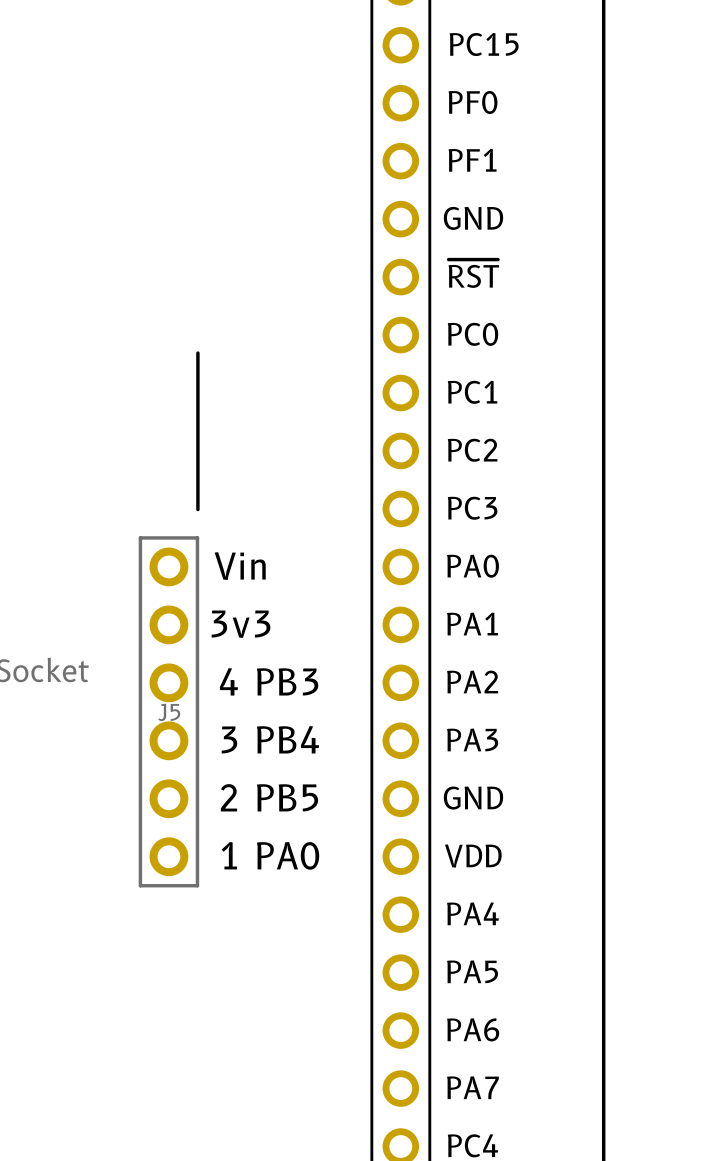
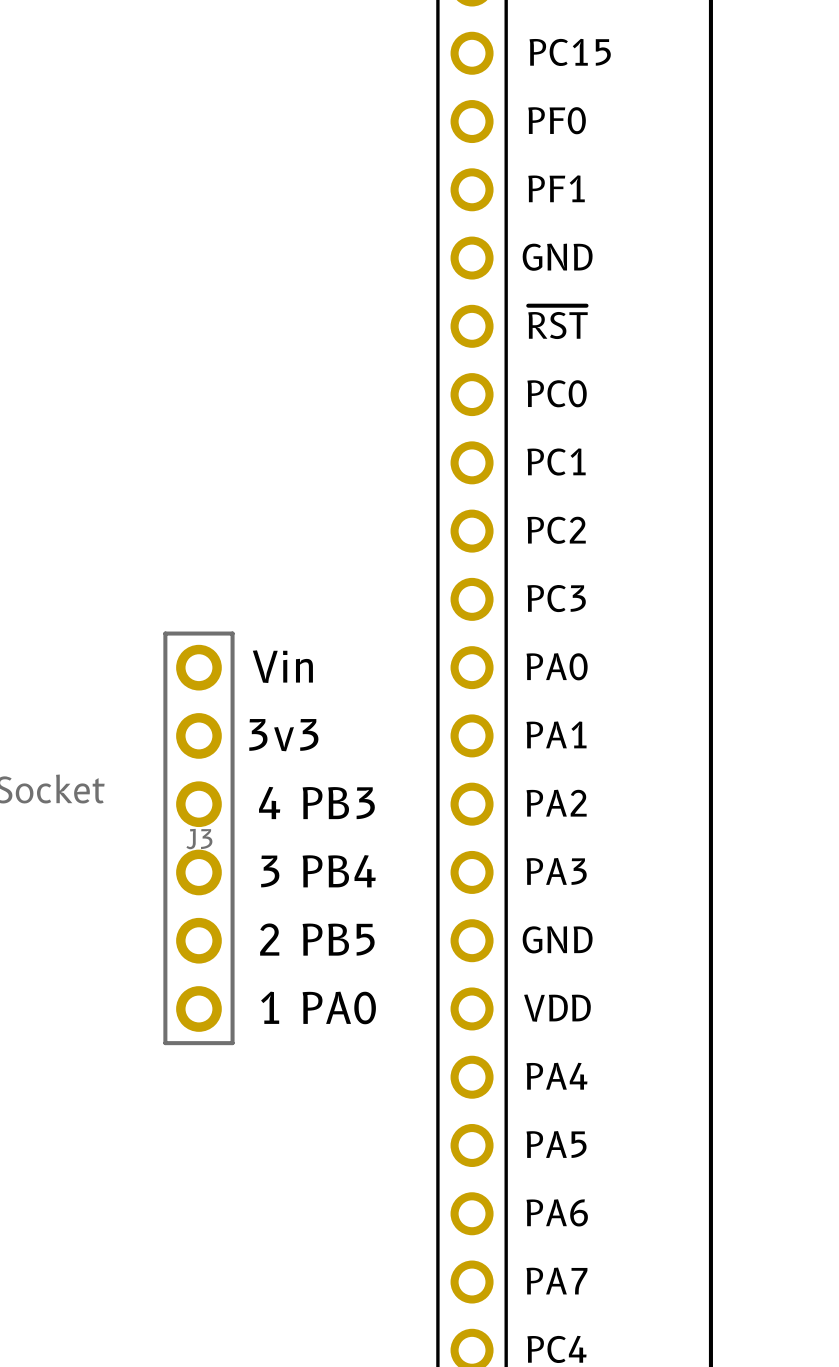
line: (197, 353) (197, 509) -> none
J5 name: J5 (169, 712) -> J3 (199, 839)

